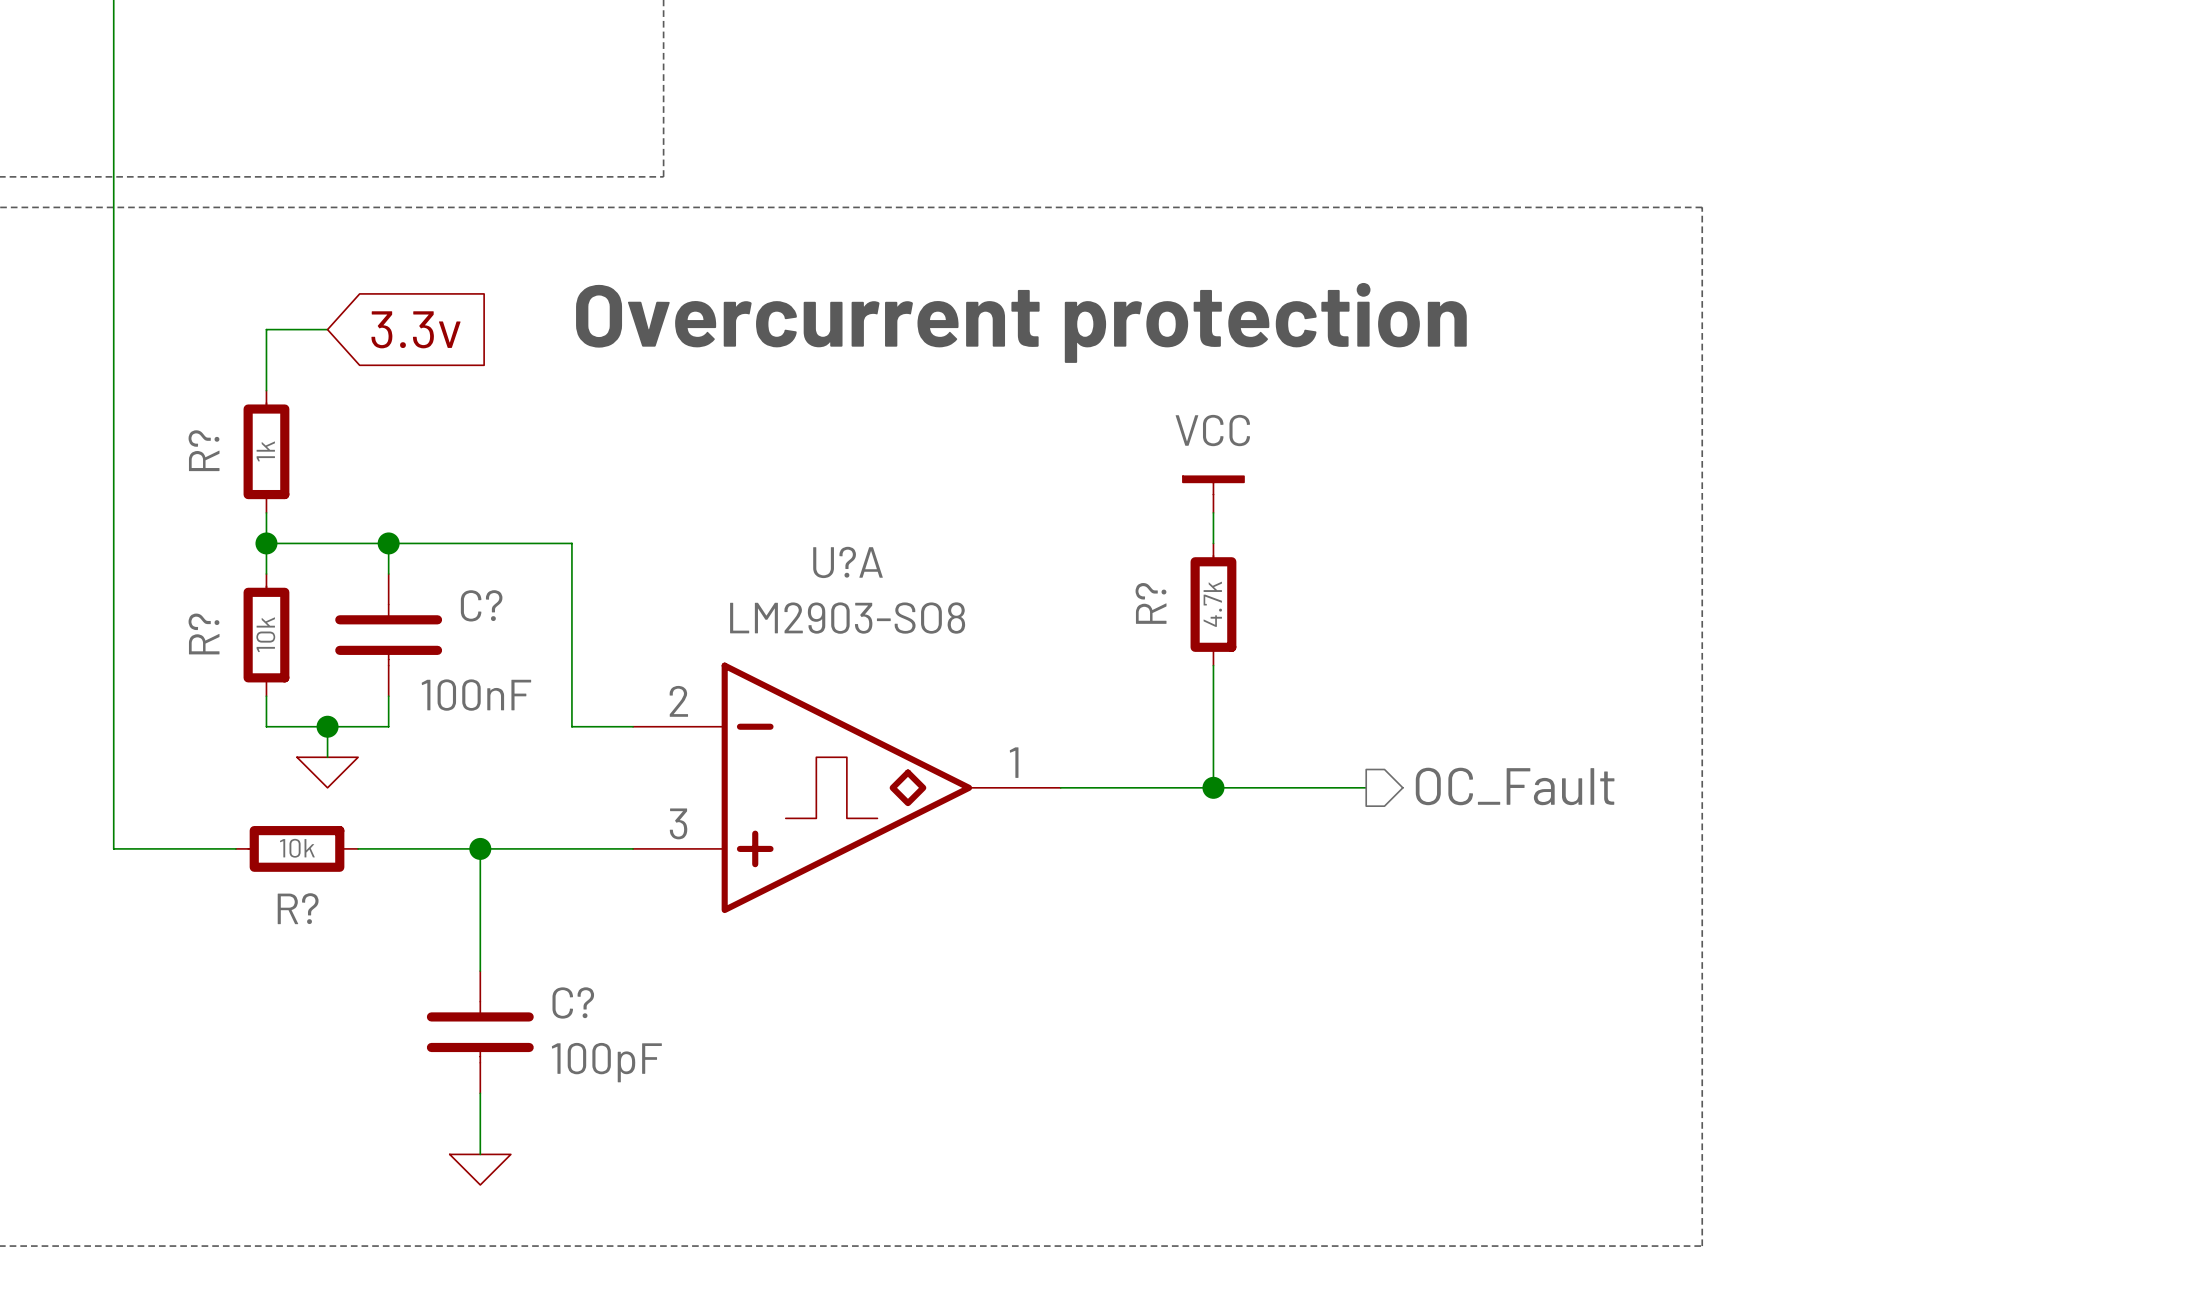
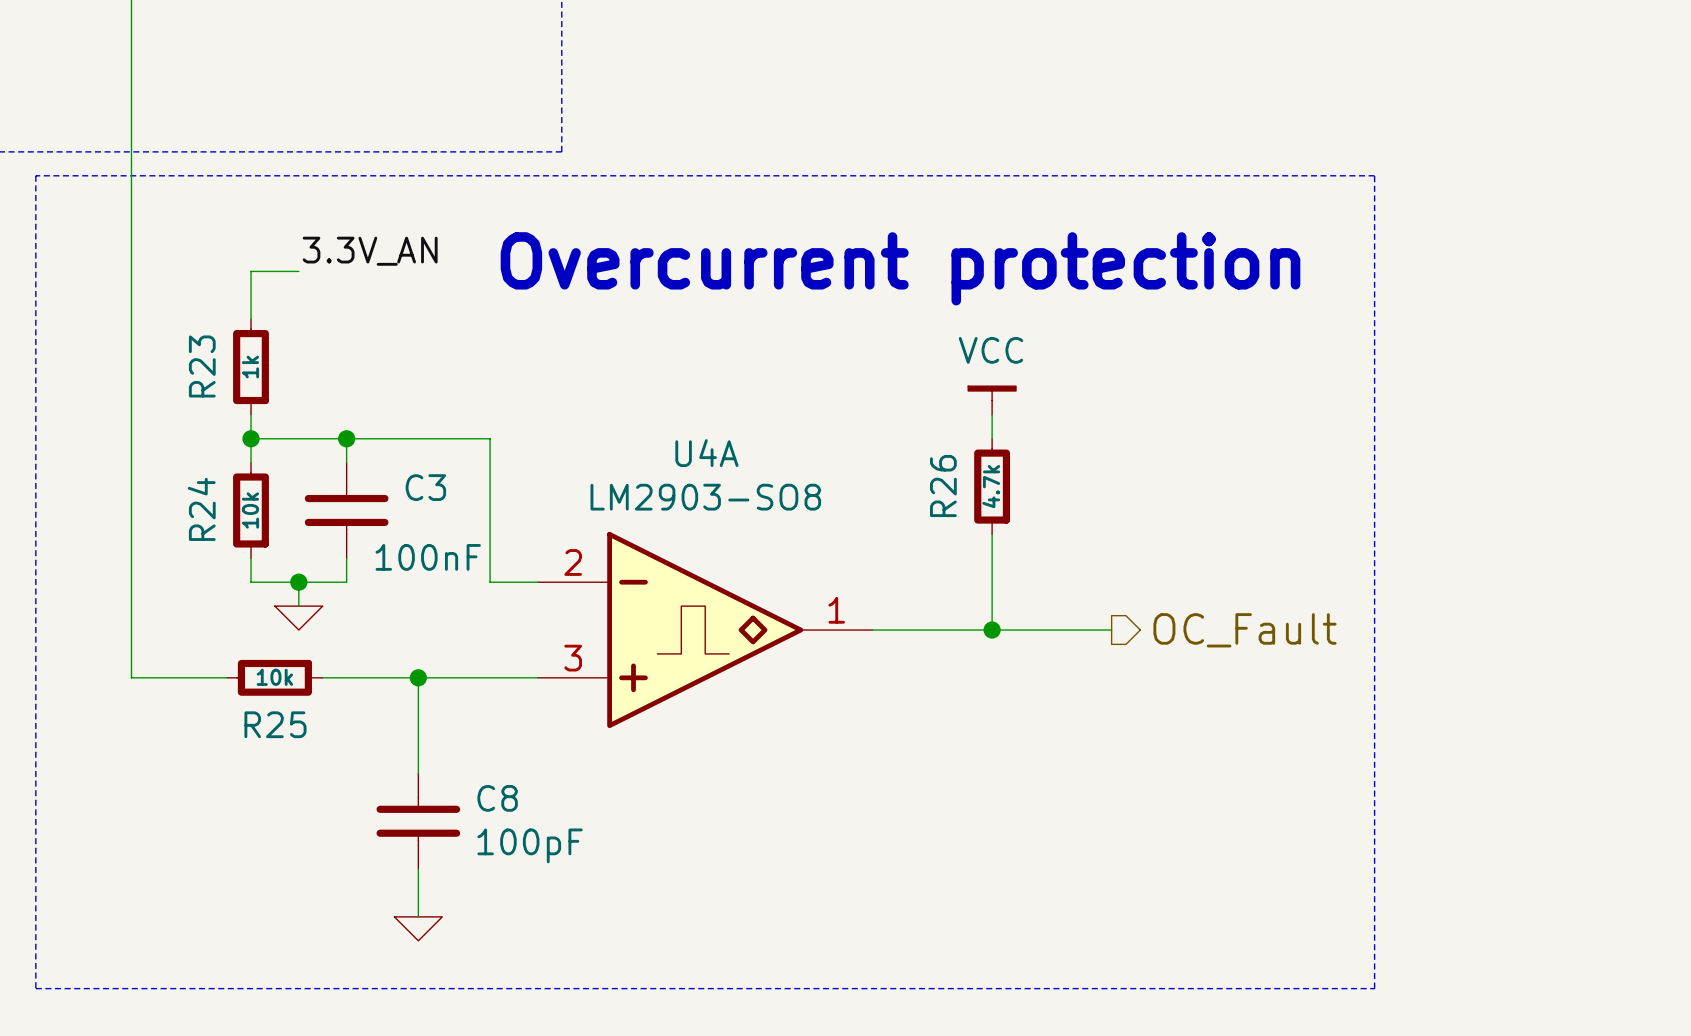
label: none -> 3.3V_AN (370, 251)
global label: 3.3v (416, 329) -> none
R? name: R? (204, 450) -> R23 (202, 366)
U?A name: U?A (847, 562) -> U4A (706, 453)
R? name: R? (1151, 603) -> R26 (943, 486)
C? name: C? (481, 605) -> C3 (425, 487)
R? name: R? (204, 633) -> R24 (201, 509)
R? name: R? (298, 908) -> R25 (275, 724)
C? name: C? (573, 1002) -> C8 (497, 798)

